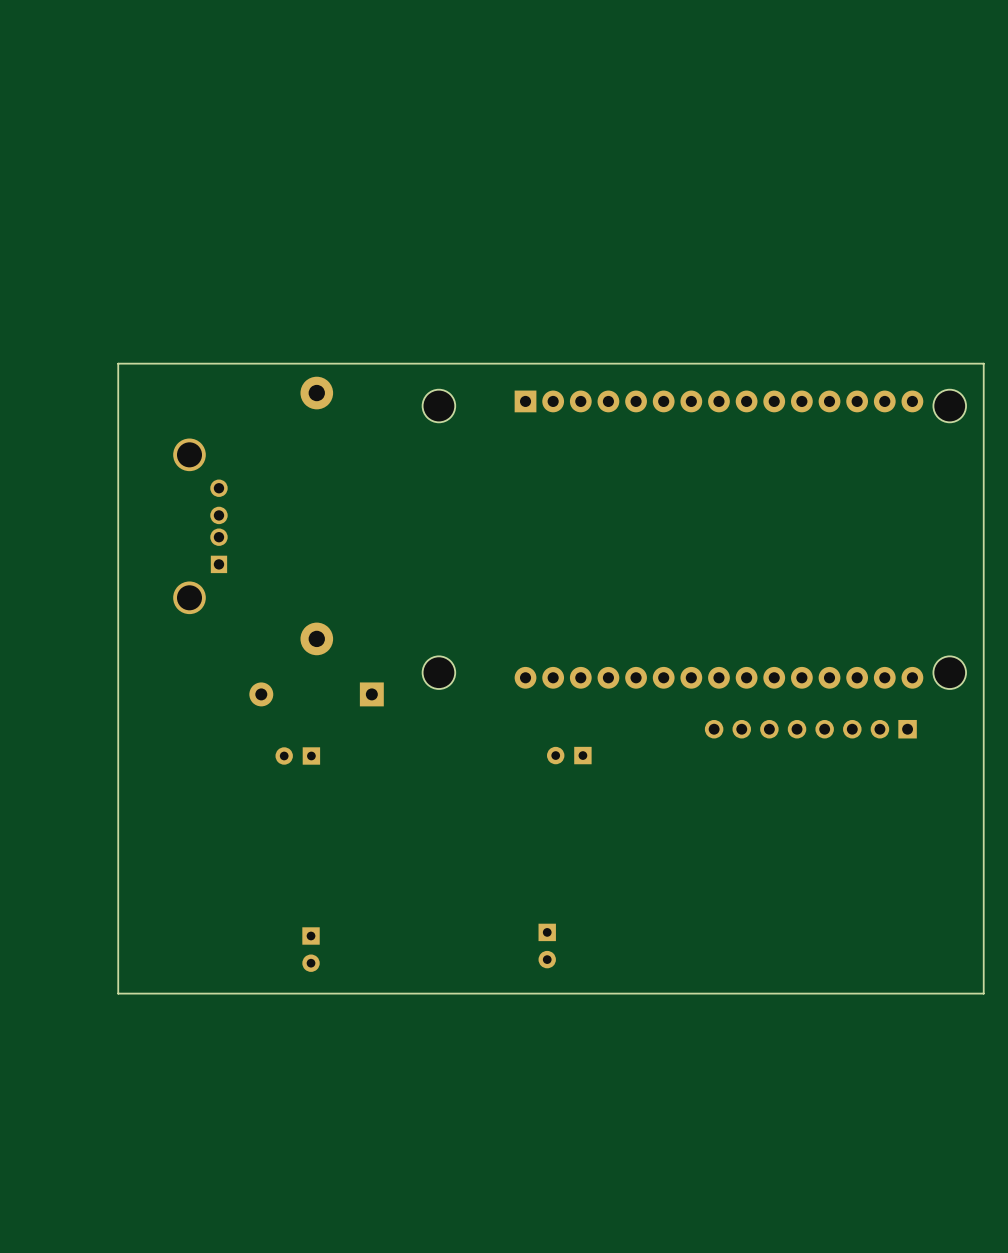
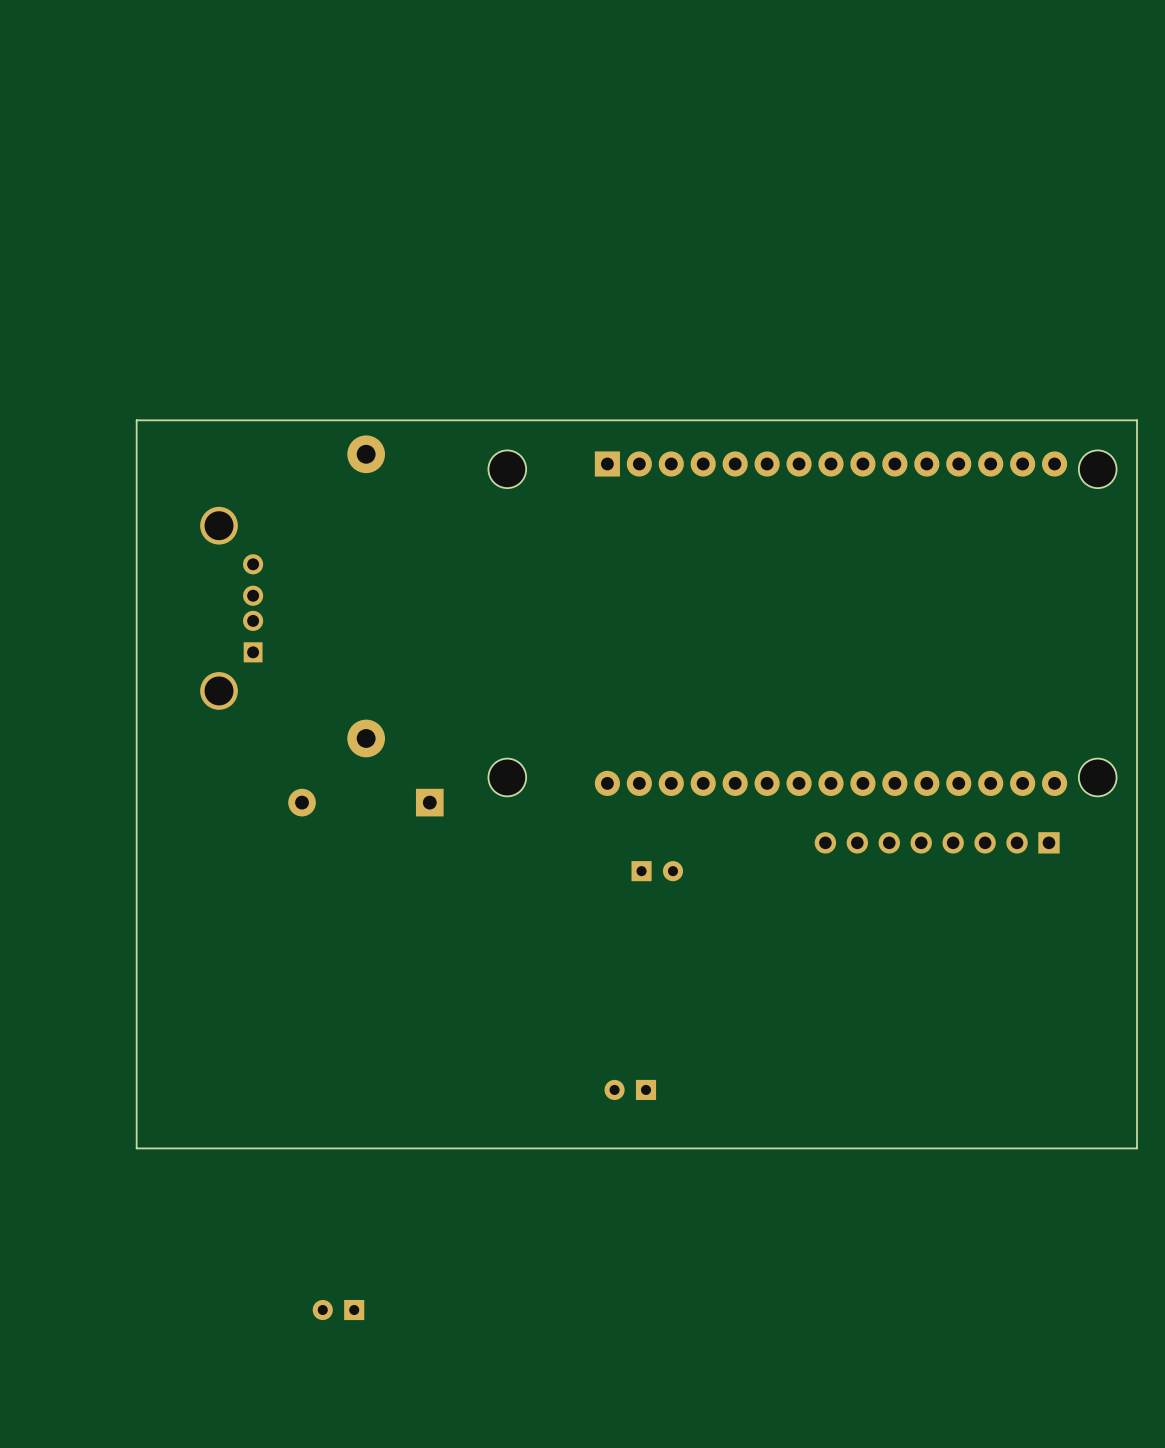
part: (297, 755) -> none
part rotation: 0° (569, 755) -> 180° (657, 871)
part rotation: 0° (547, 946) -> 90° clockwise (630, 1089)
part rotation: 0° (311, 949) -> 90° clockwise (338, 1310)
part position: (311, 949) -> (338, 1310)

